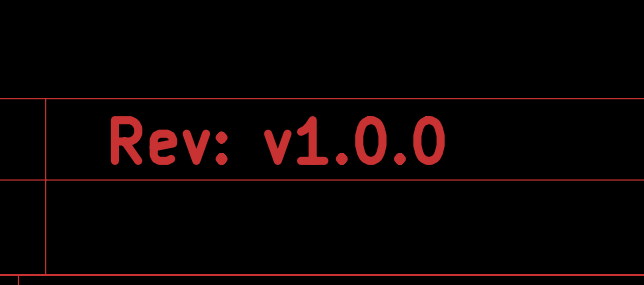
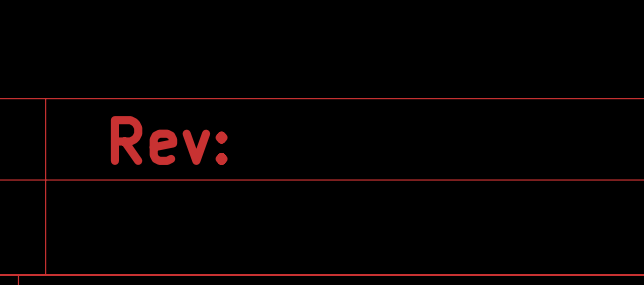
title block: Rev: v1.0.0 (277, 140) -> Rev: (169, 140)

